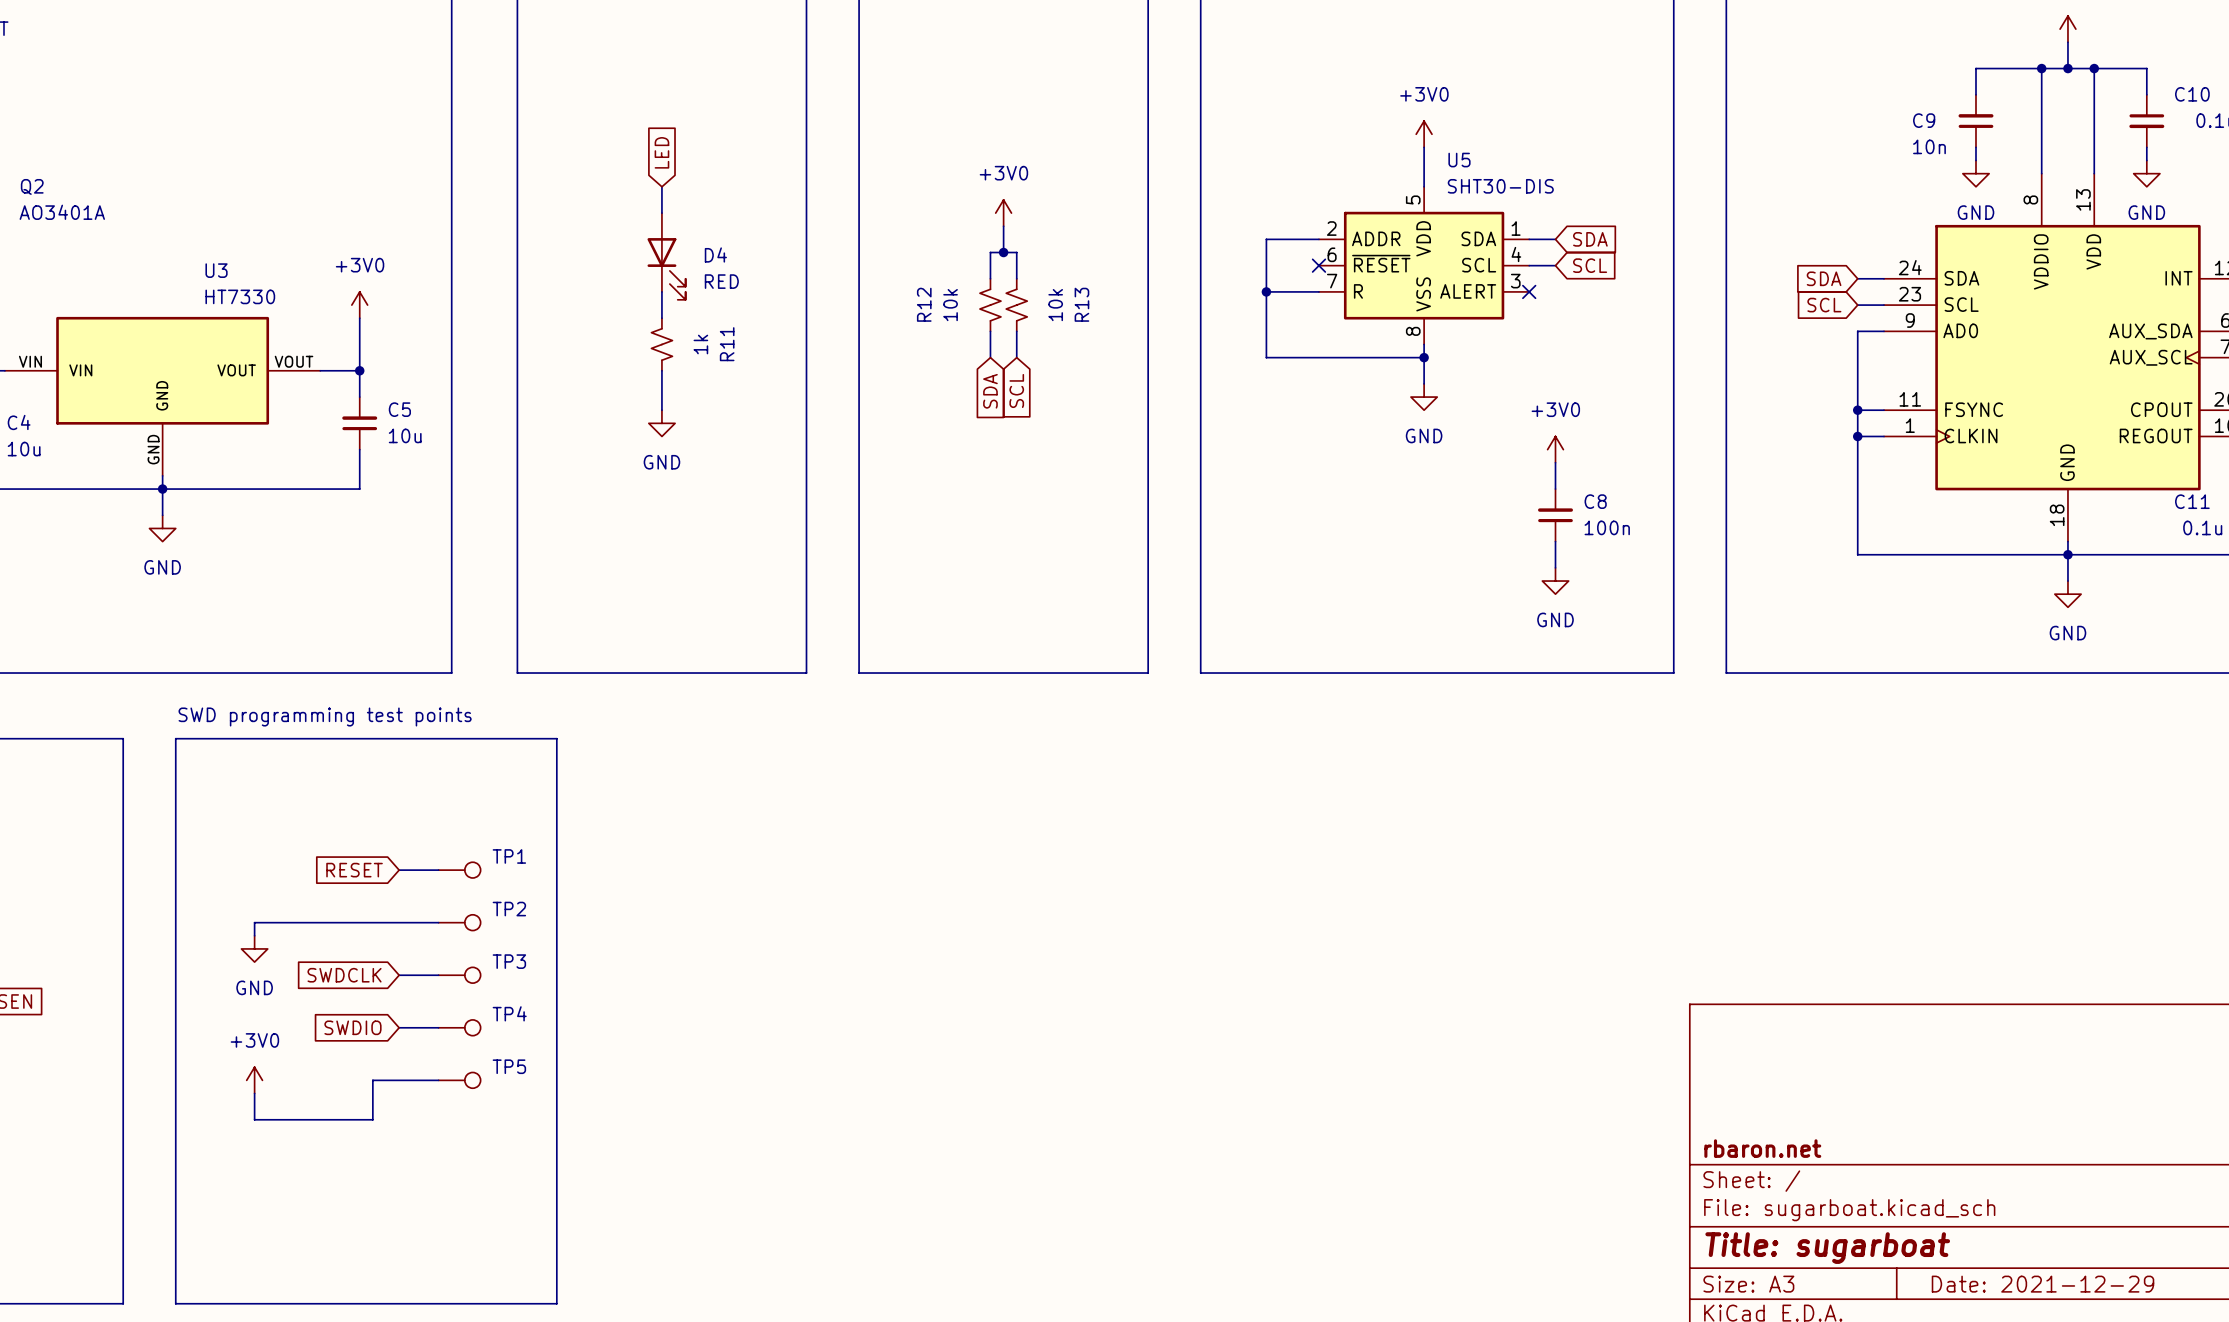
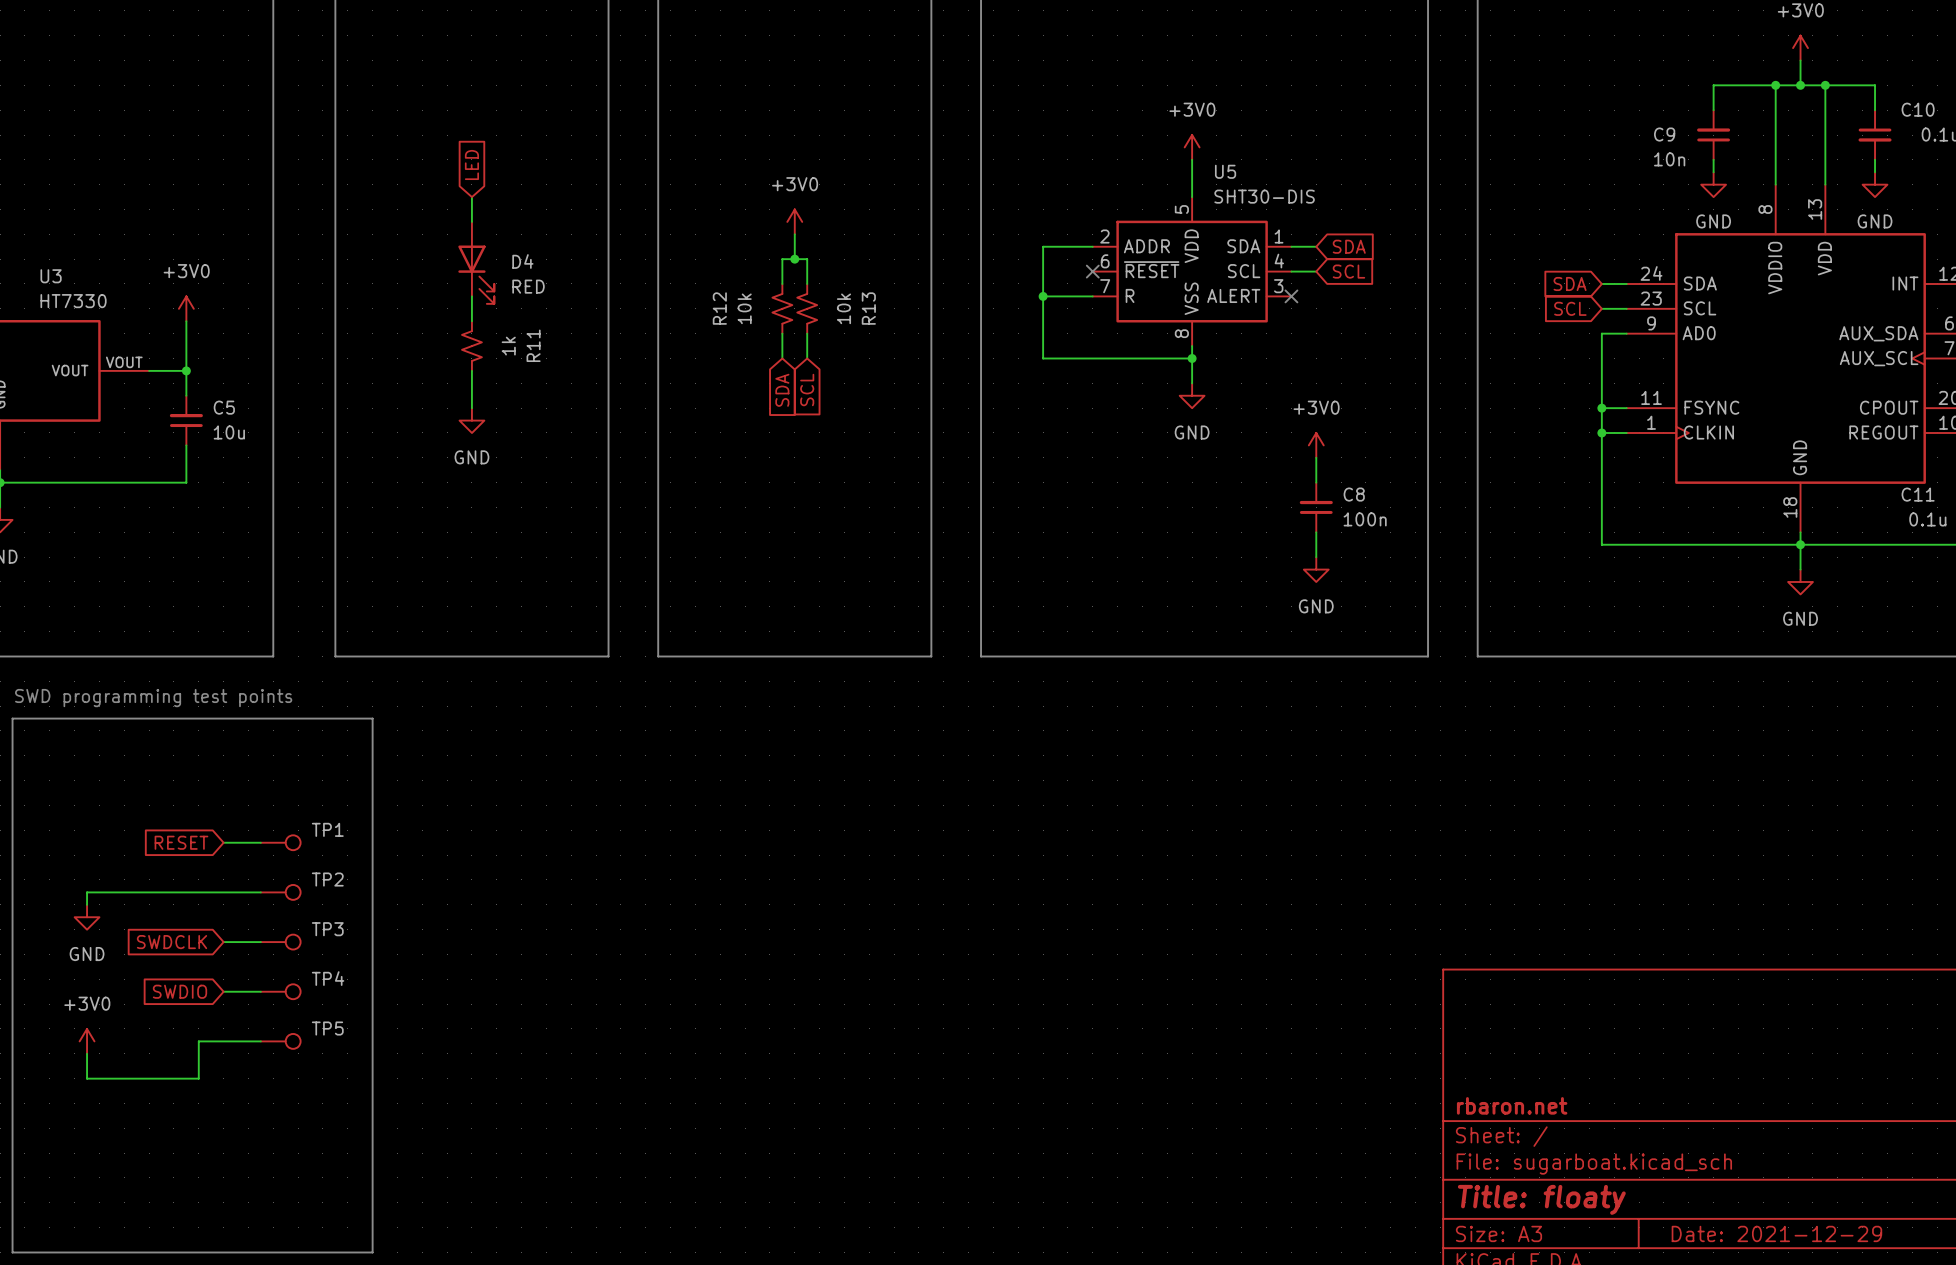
title block: Title: sugarboat (1827, 1248) -> Title: floaty (1541, 1199)

